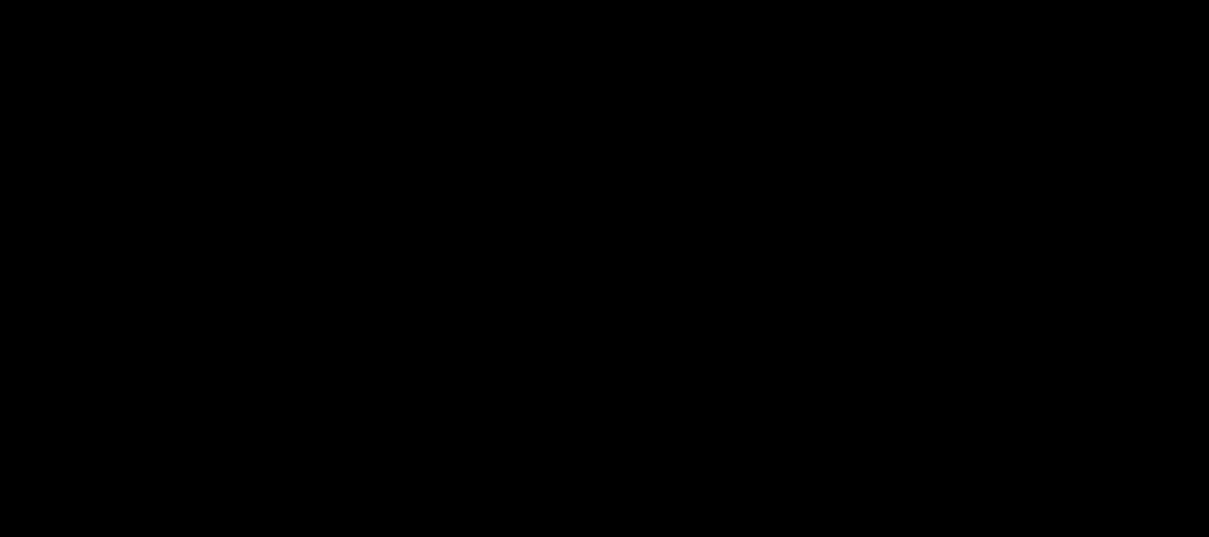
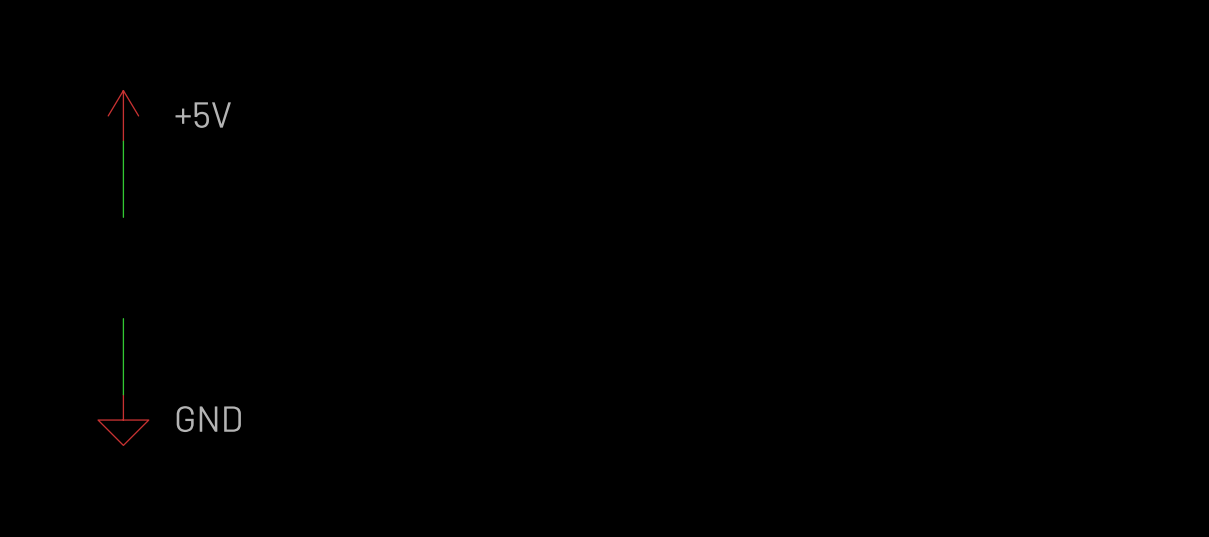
power symbol: none -> +5V (123, 115)
wire: none -> (123, 141) (123, 217)
wire: none -> (123, 318) (123, 394)
power symbol: none -> GND (123, 420)

